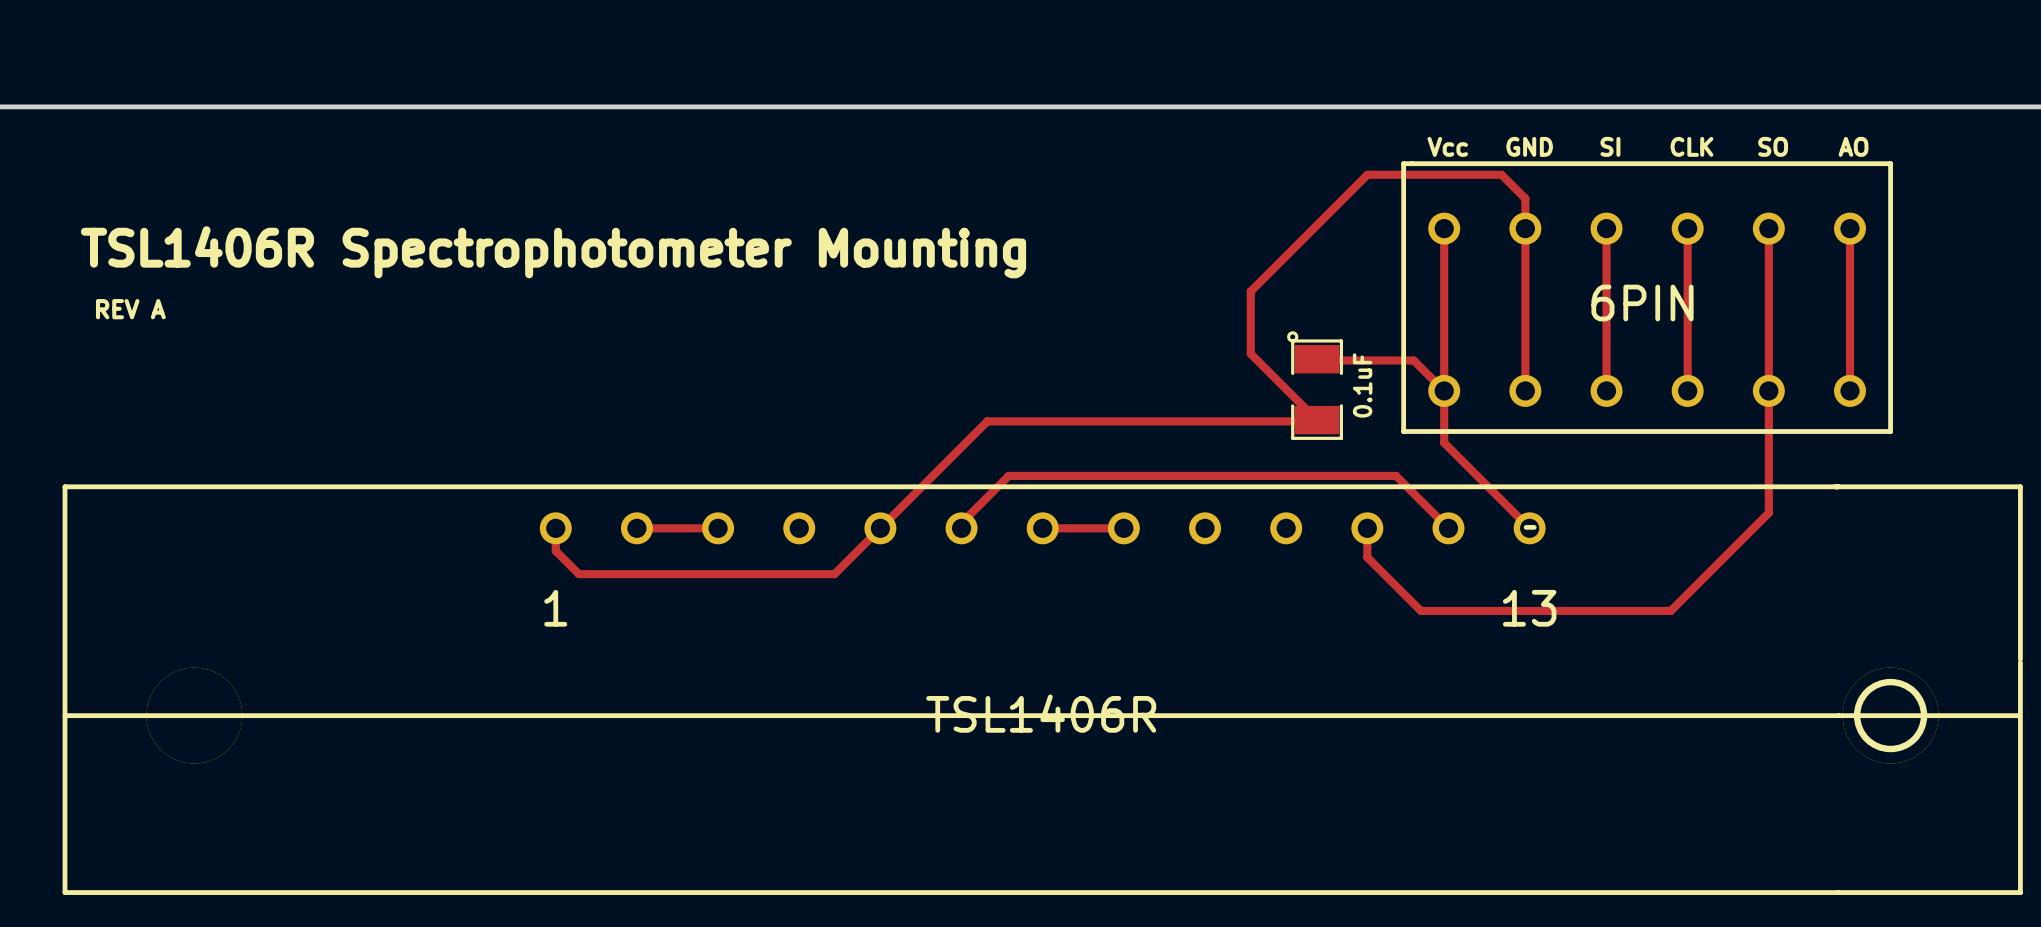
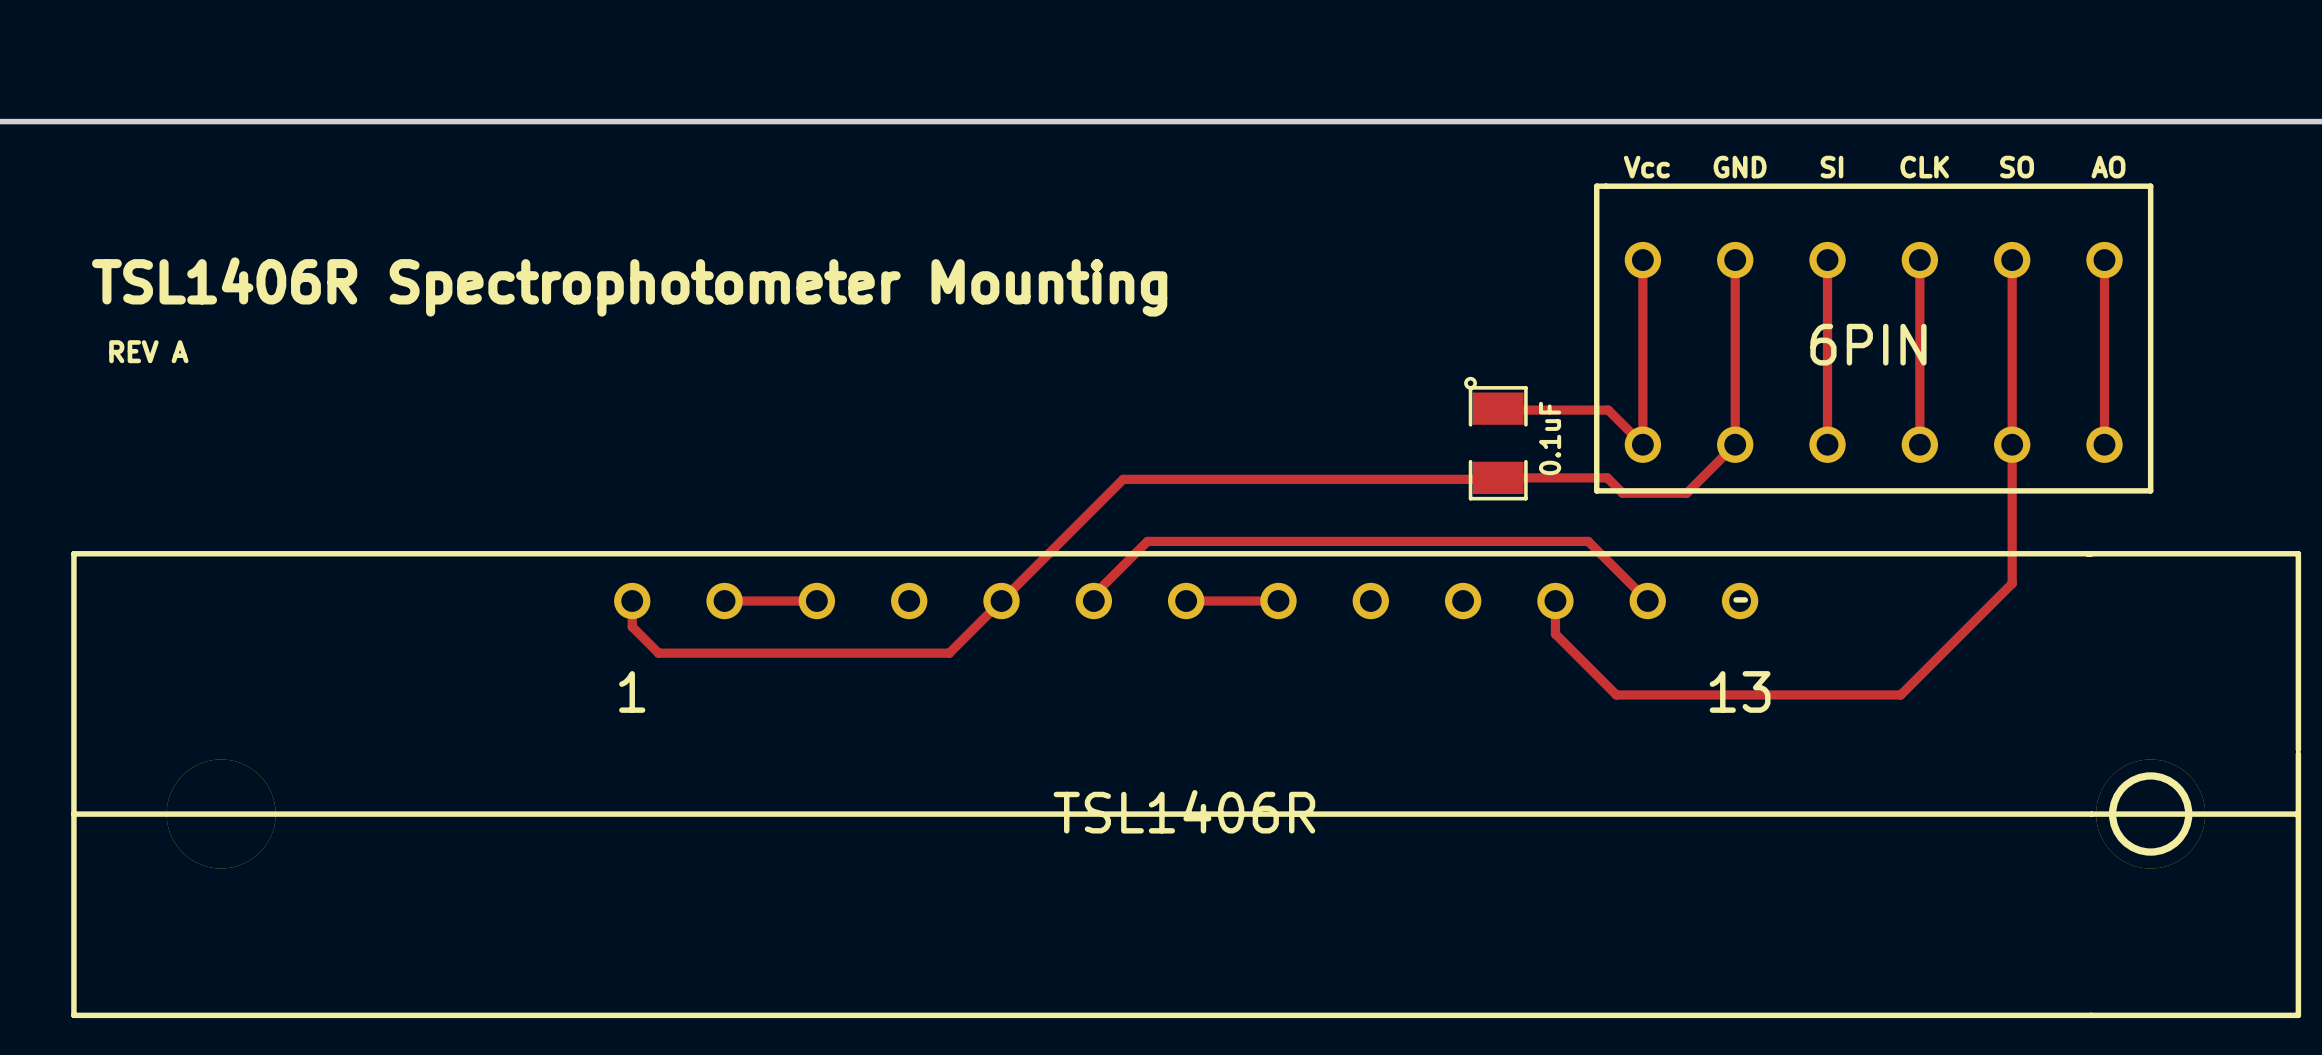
track: (1525, 228) (1525, 198) (1501, 174) (1367, 174) (1250, 291) (1250, 353) (1317, 420) -> (1735, 444) (1686, 493) (1622, 493) (1607, 477) (1498, 477)
track: (1444, 390) (1444, 442) (1529, 528) -> none

